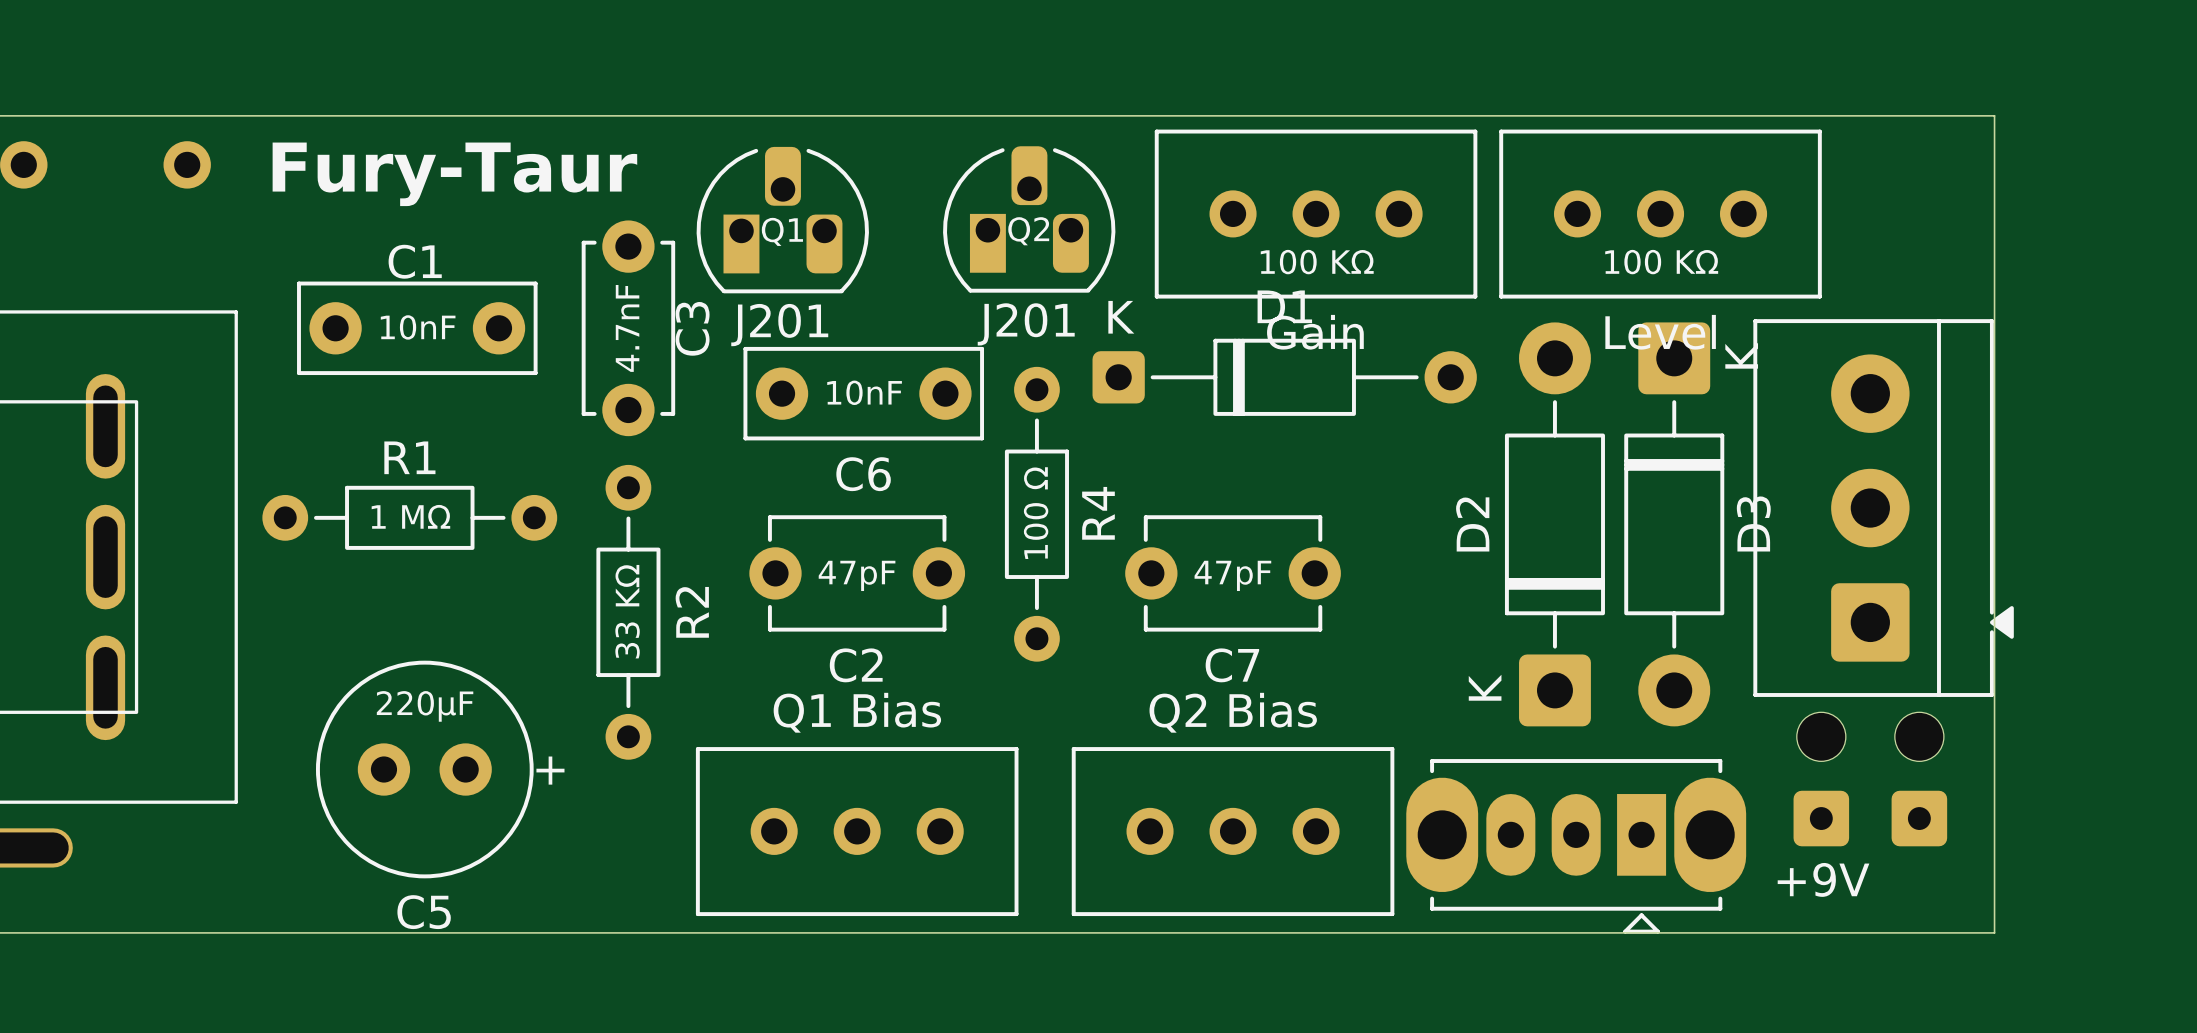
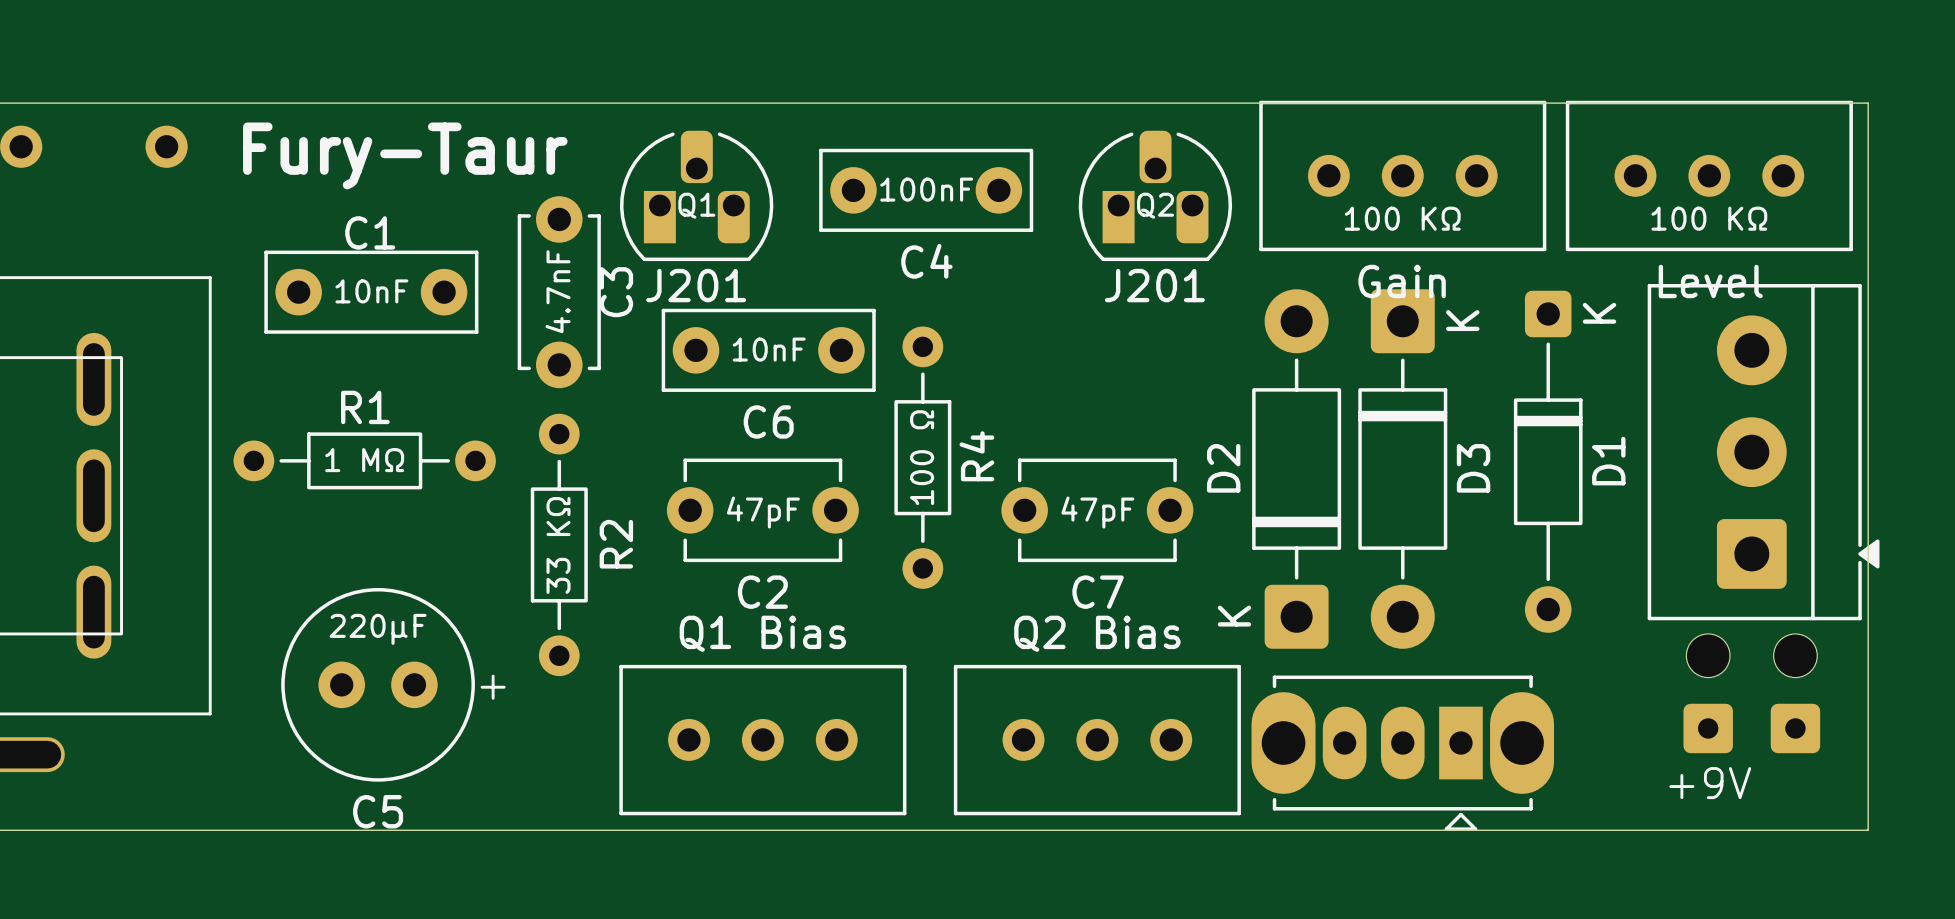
board edge: (1994, 115) (1994, 932) -> (1775, 103) (1868, 103) (1868, 830) (1775, 830)
C4: none -> (926, 190)
part position: (1316, 214) -> (1402, 175)
part position: (1660, 214) -> (1709, 175)
Q2 position: (1029, 219) -> (1155, 195)
D1 rotation: 0° (1284, 377) -> 90° clockwise (1548, 461)
D1 position: (1284, 377) -> (1548, 461)
part position: (1883, 508) -> (1763, 452)
D2 position: (1554, 524) -> (1296, 469)
D3 position: (1674, 524) -> (1402, 469)
part position: (1821, 736) -> (1795, 655)
part position: (1821, 818) -> (1795, 728)
text position: +9V (1823, 879) -> +9V (1710, 783)

